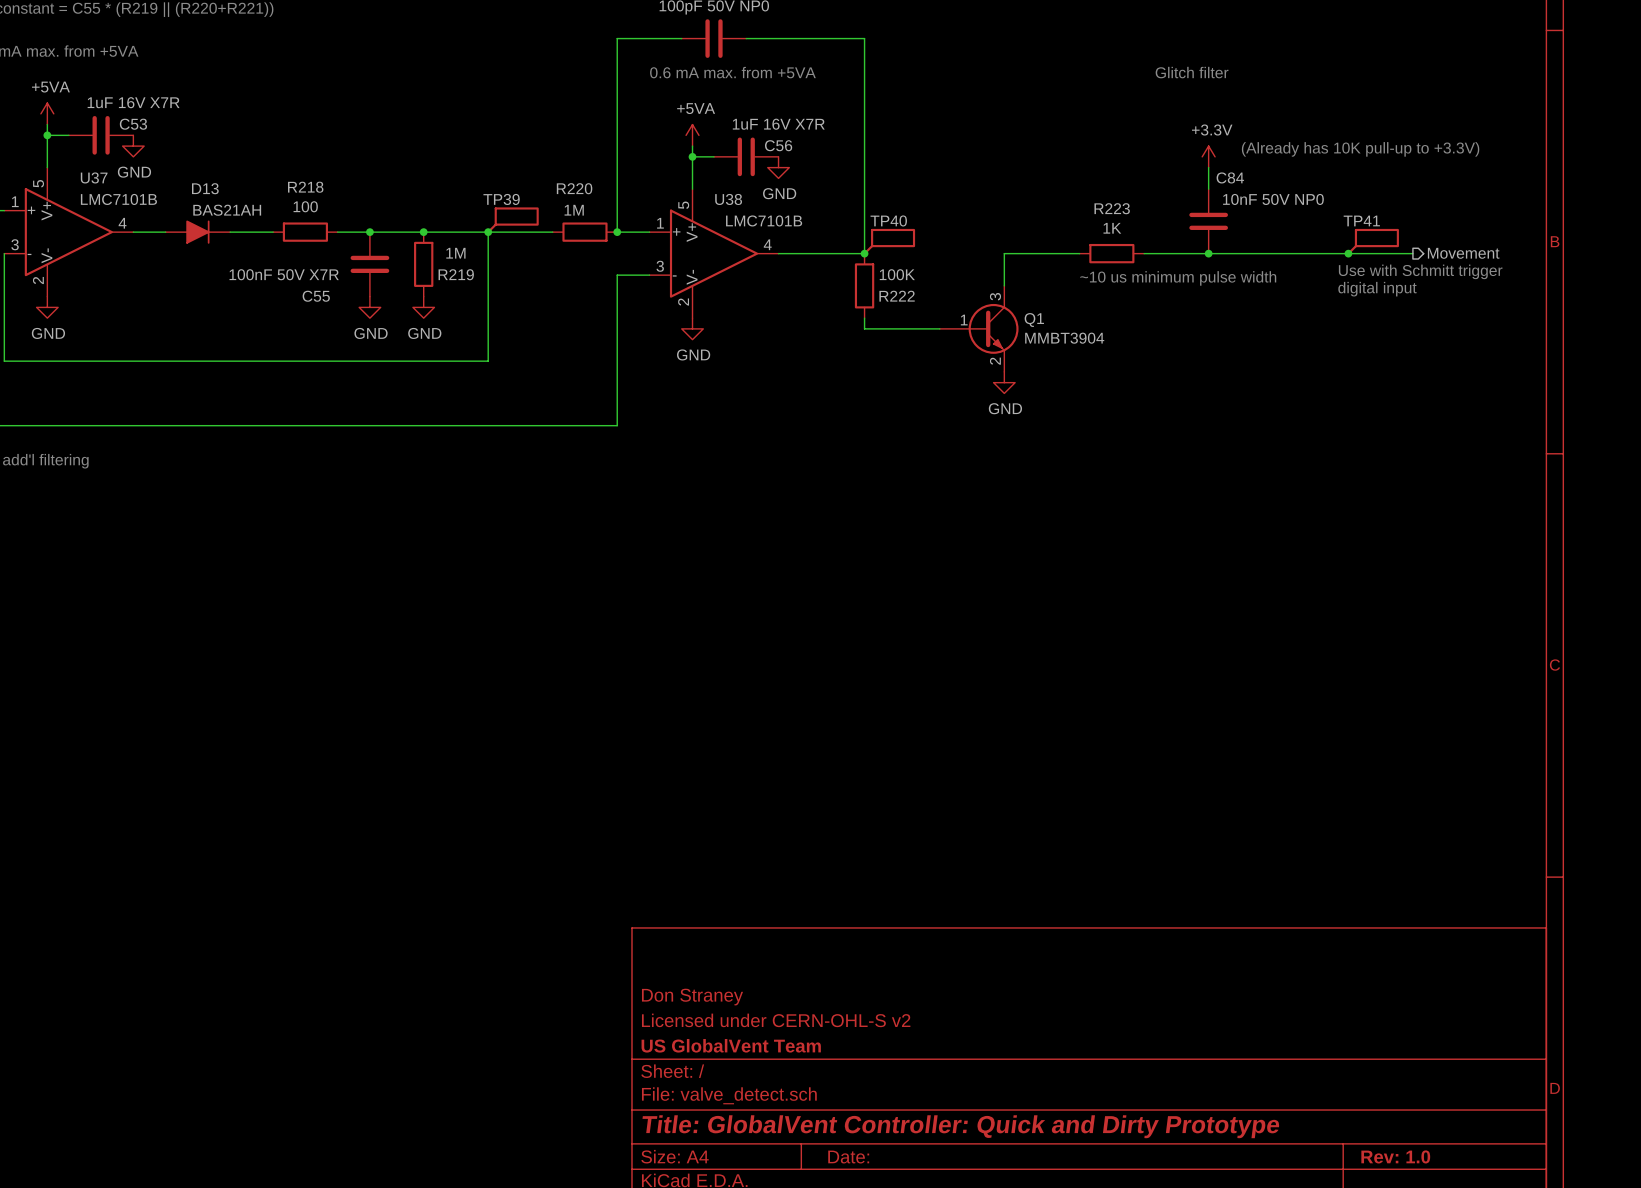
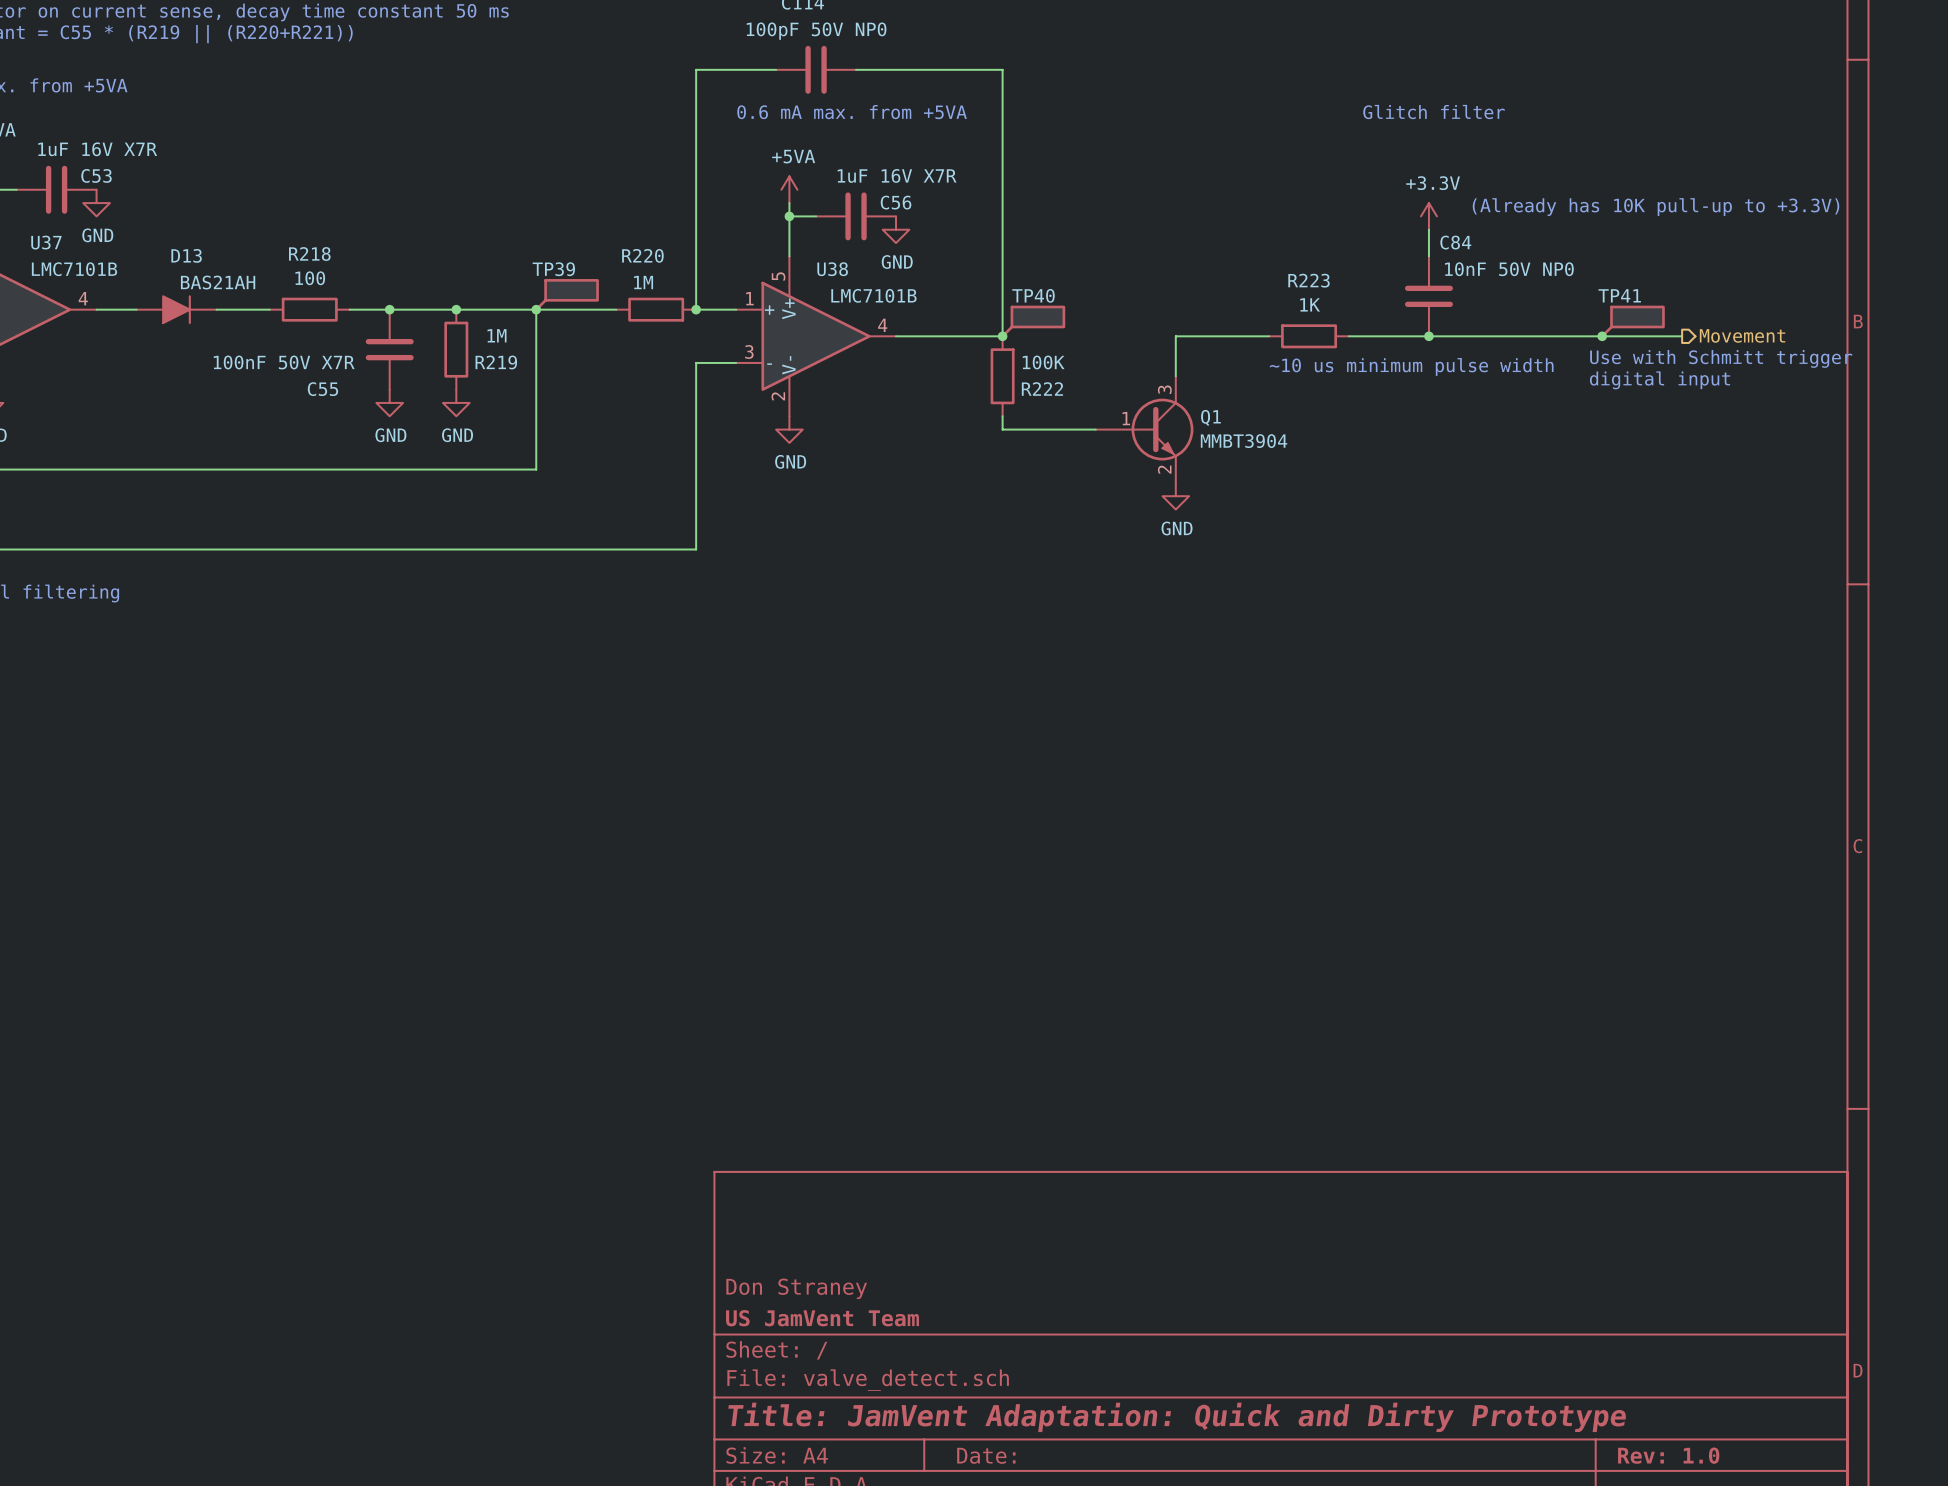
title block: Don Straney (692, 997) -> none
title block: Licensed under CERN-OHL-S v2 (776, 1020) -> Don Straney (796, 1288)
title block: US GlobalVent Team (731, 1045) -> US JamVent Team (822, 1318)
title block: Title: GlobalVent Controller: Quick and Dirty Prototype (960, 1126) -> Title: JamVent Adaptation: Quick and Dirty Prototype (1177, 1417)

